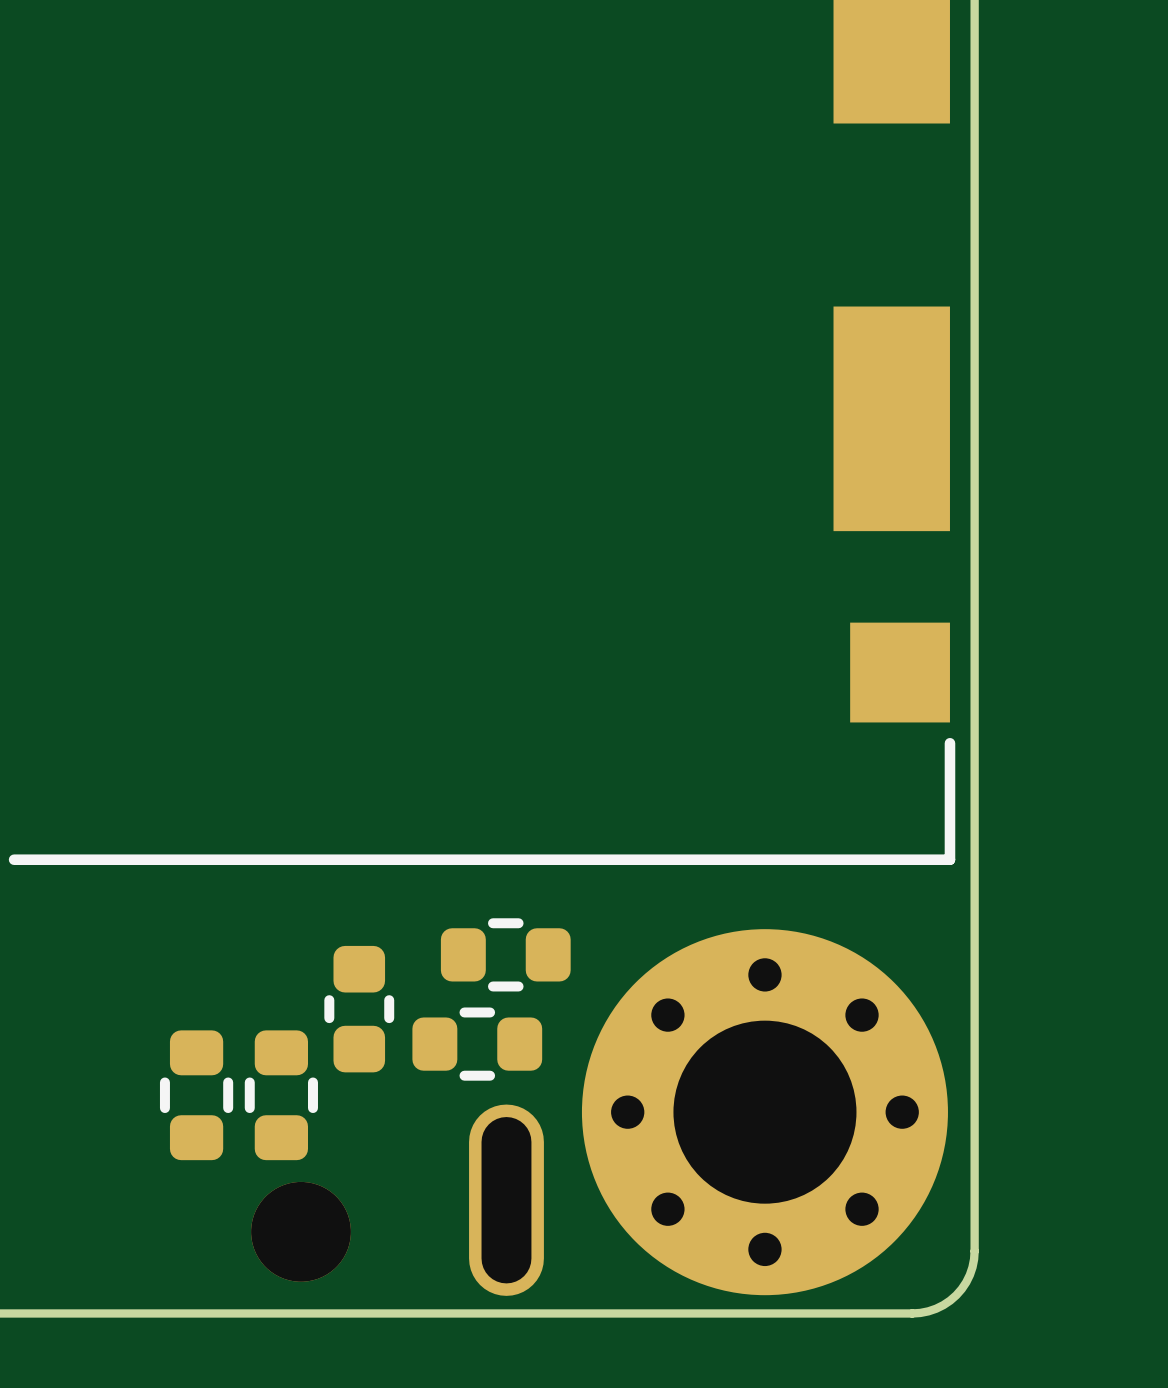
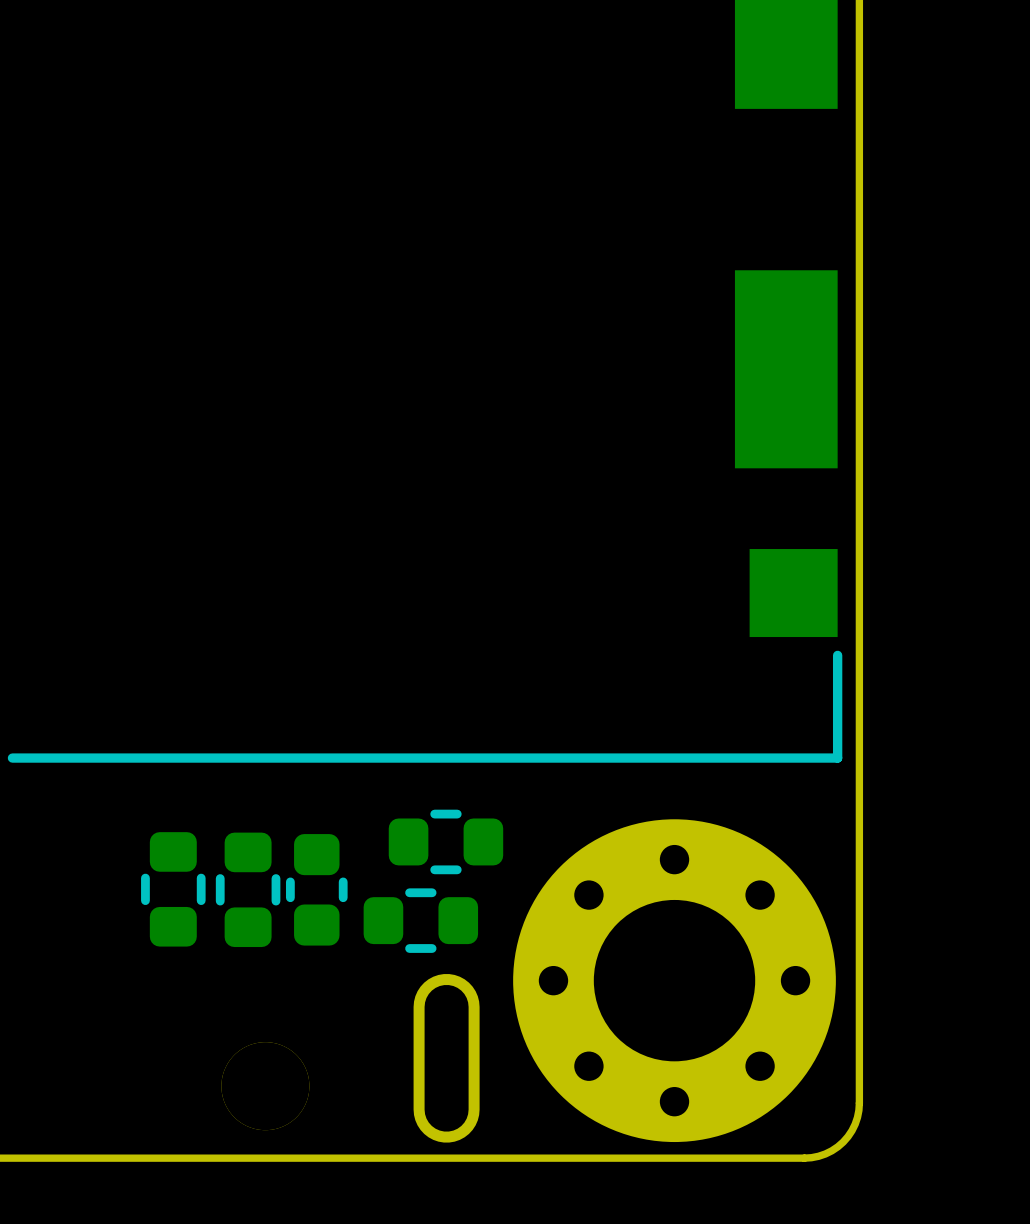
part: none -> (173, 889)
part: none -> (248, 889)
part: (196, 1095) -> none
part: (281, 1095) -> none

